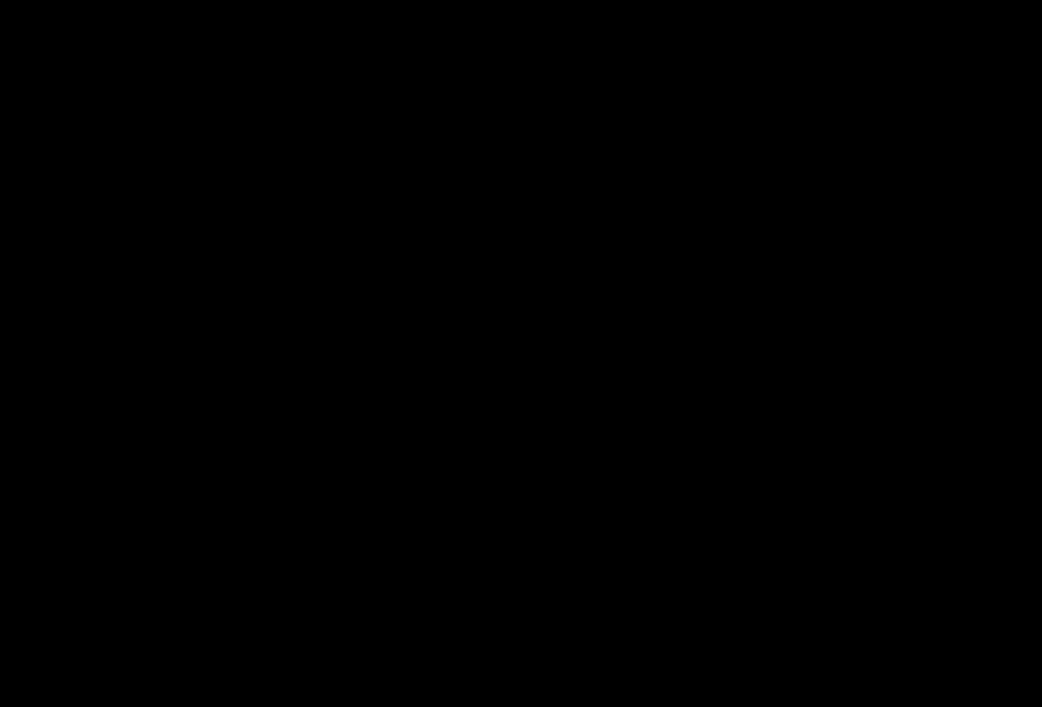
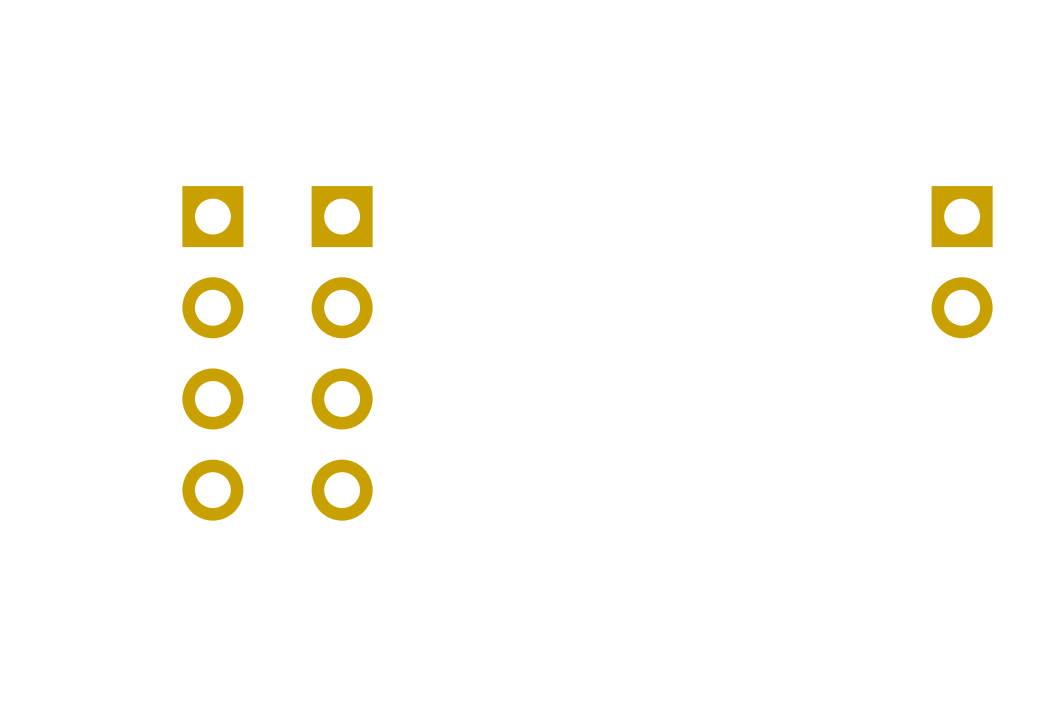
part: none -> (962, 262)
part: none -> (212, 353)
part: none -> (342, 353)

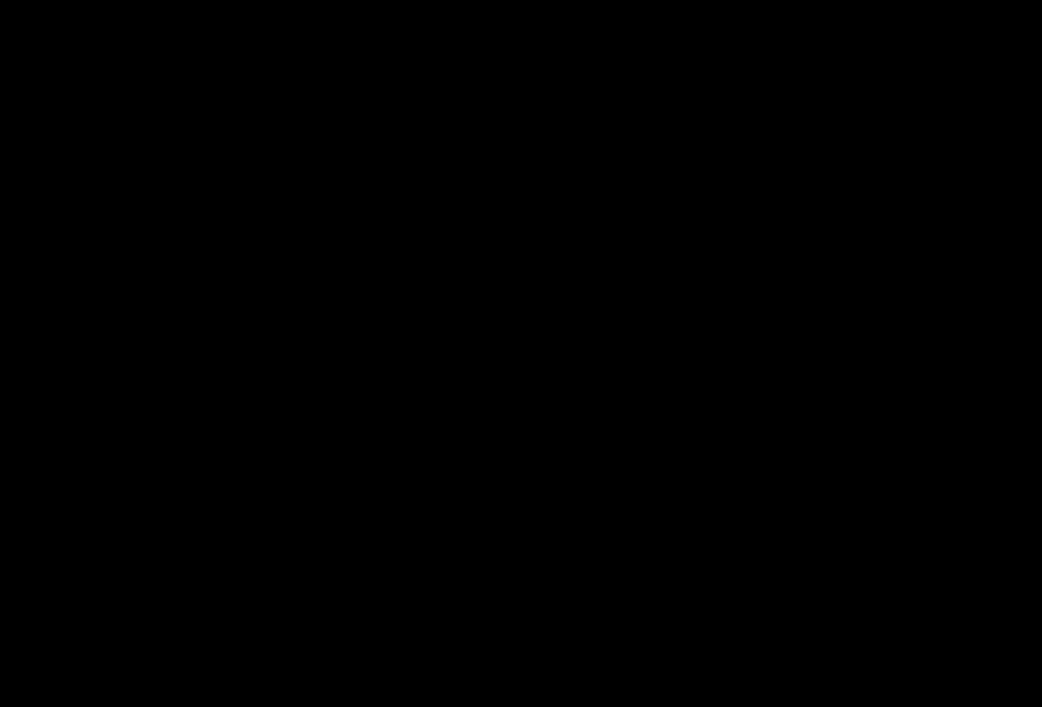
part: (962, 262) -> none
part: (212, 353) -> none
part: (342, 353) -> none

